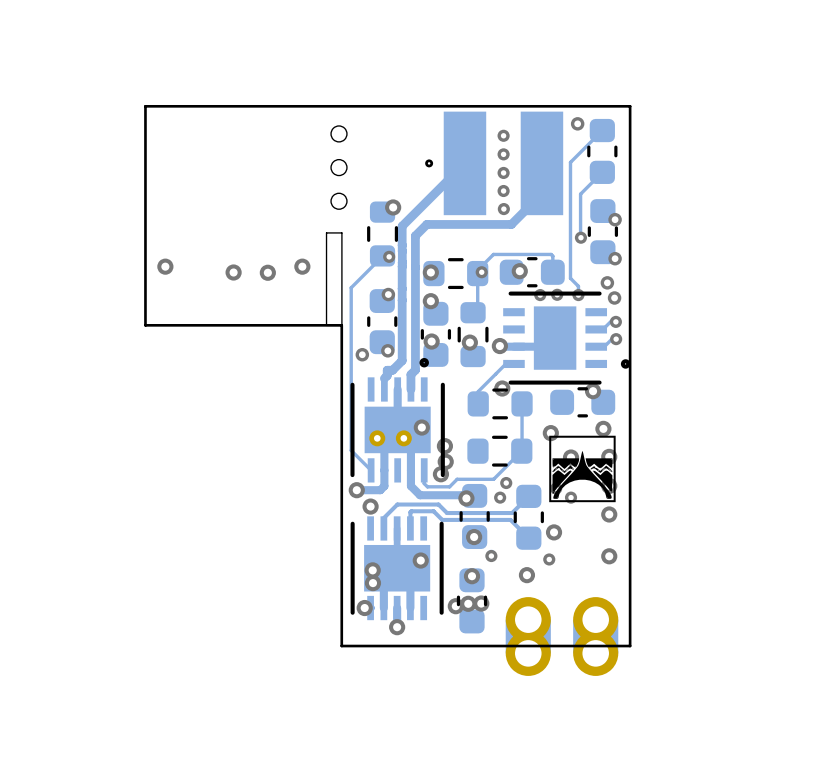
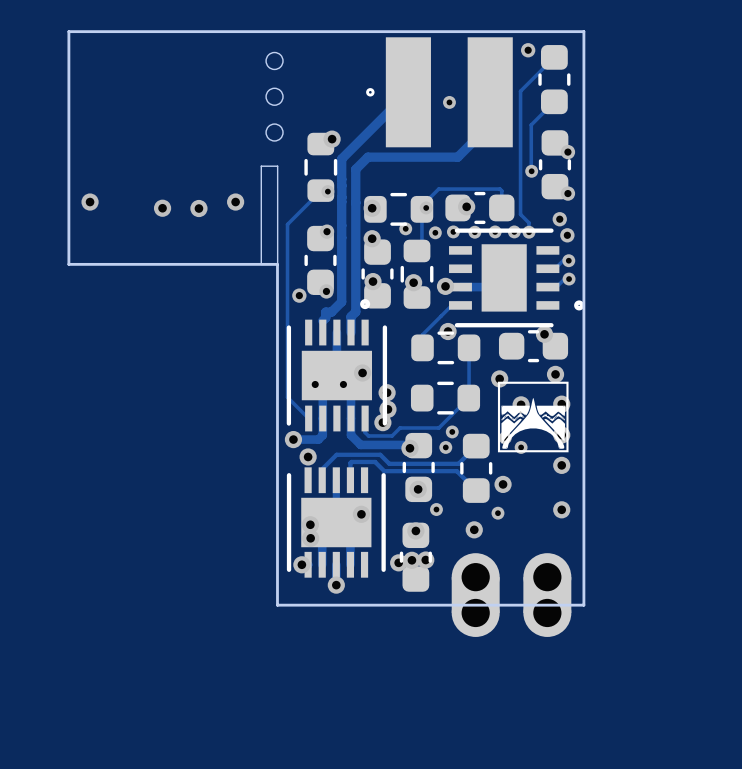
via: (503, 135) -> none
via: (503, 154) -> none
via: (503, 191) -> none
via: (503, 209) -> none
via: none -> (405, 228)
via: none -> (453, 231)
via: none -> (495, 231)
via: (557, 294) -> none
via: none -> (514, 231)
via: none -> (435, 232)
via: none -> (474, 232)
via: (540, 295) -> none

